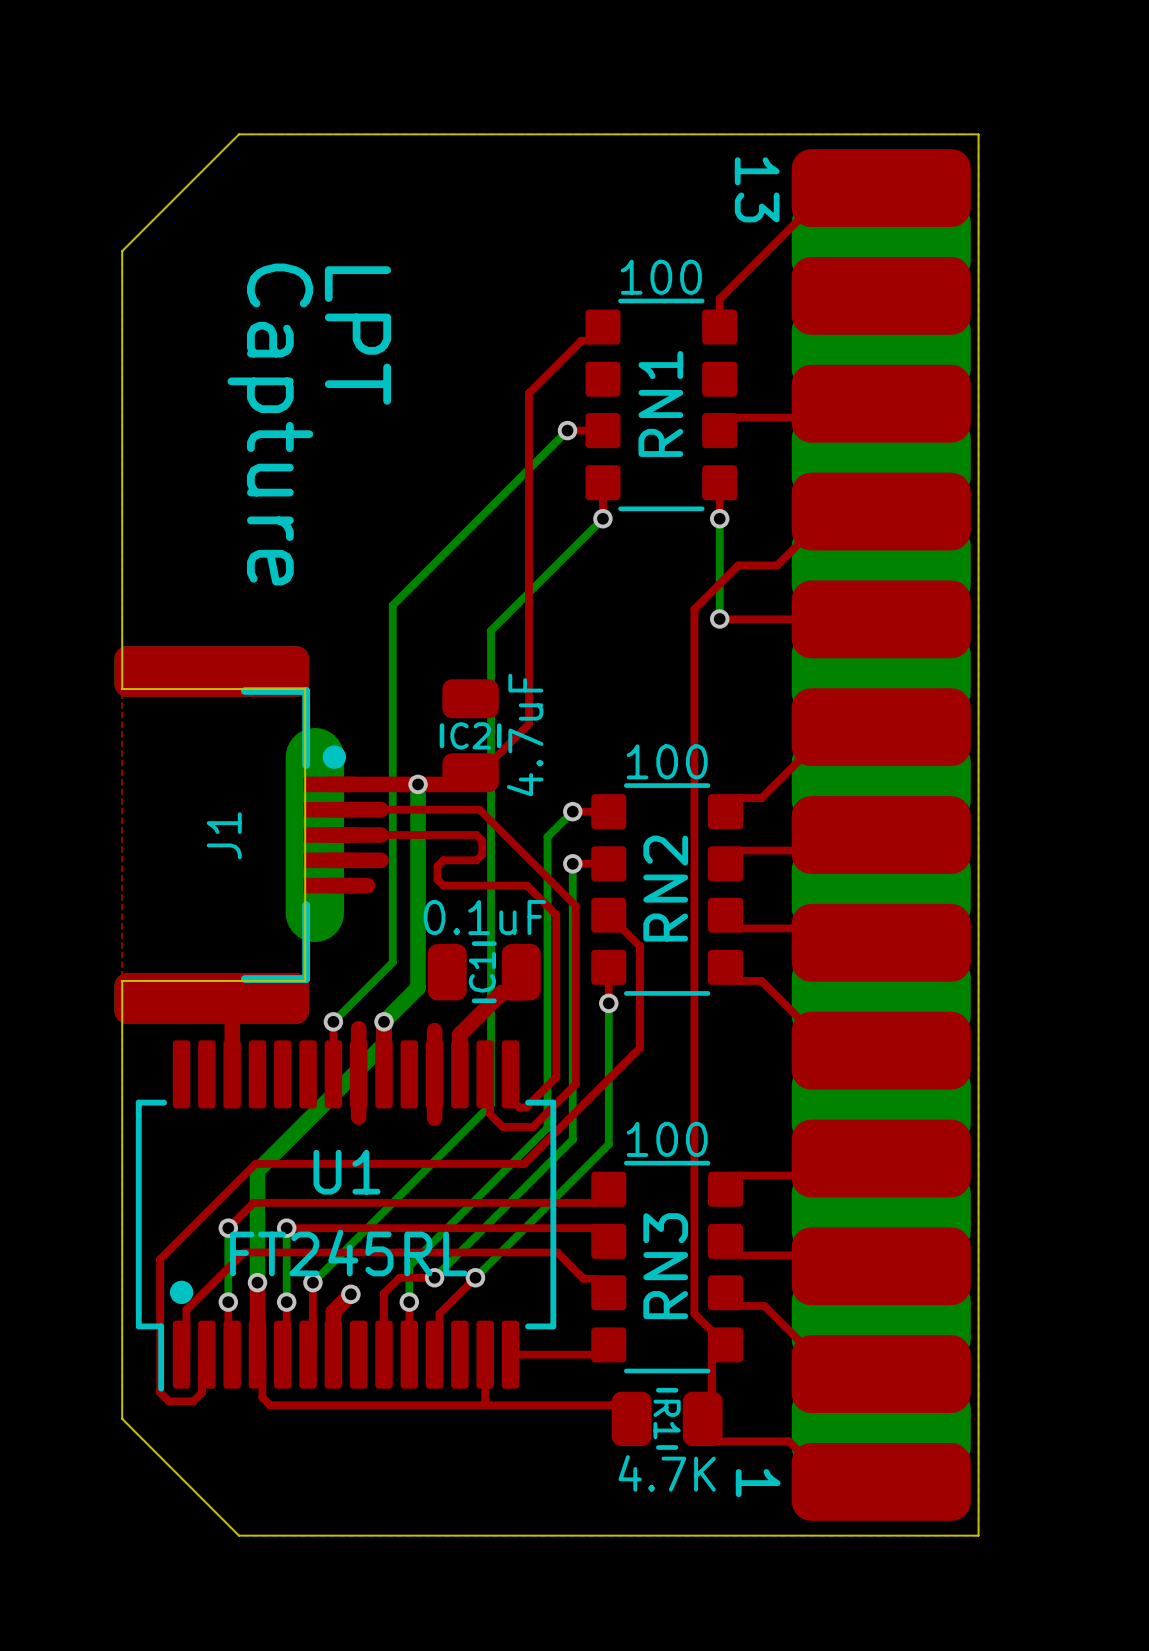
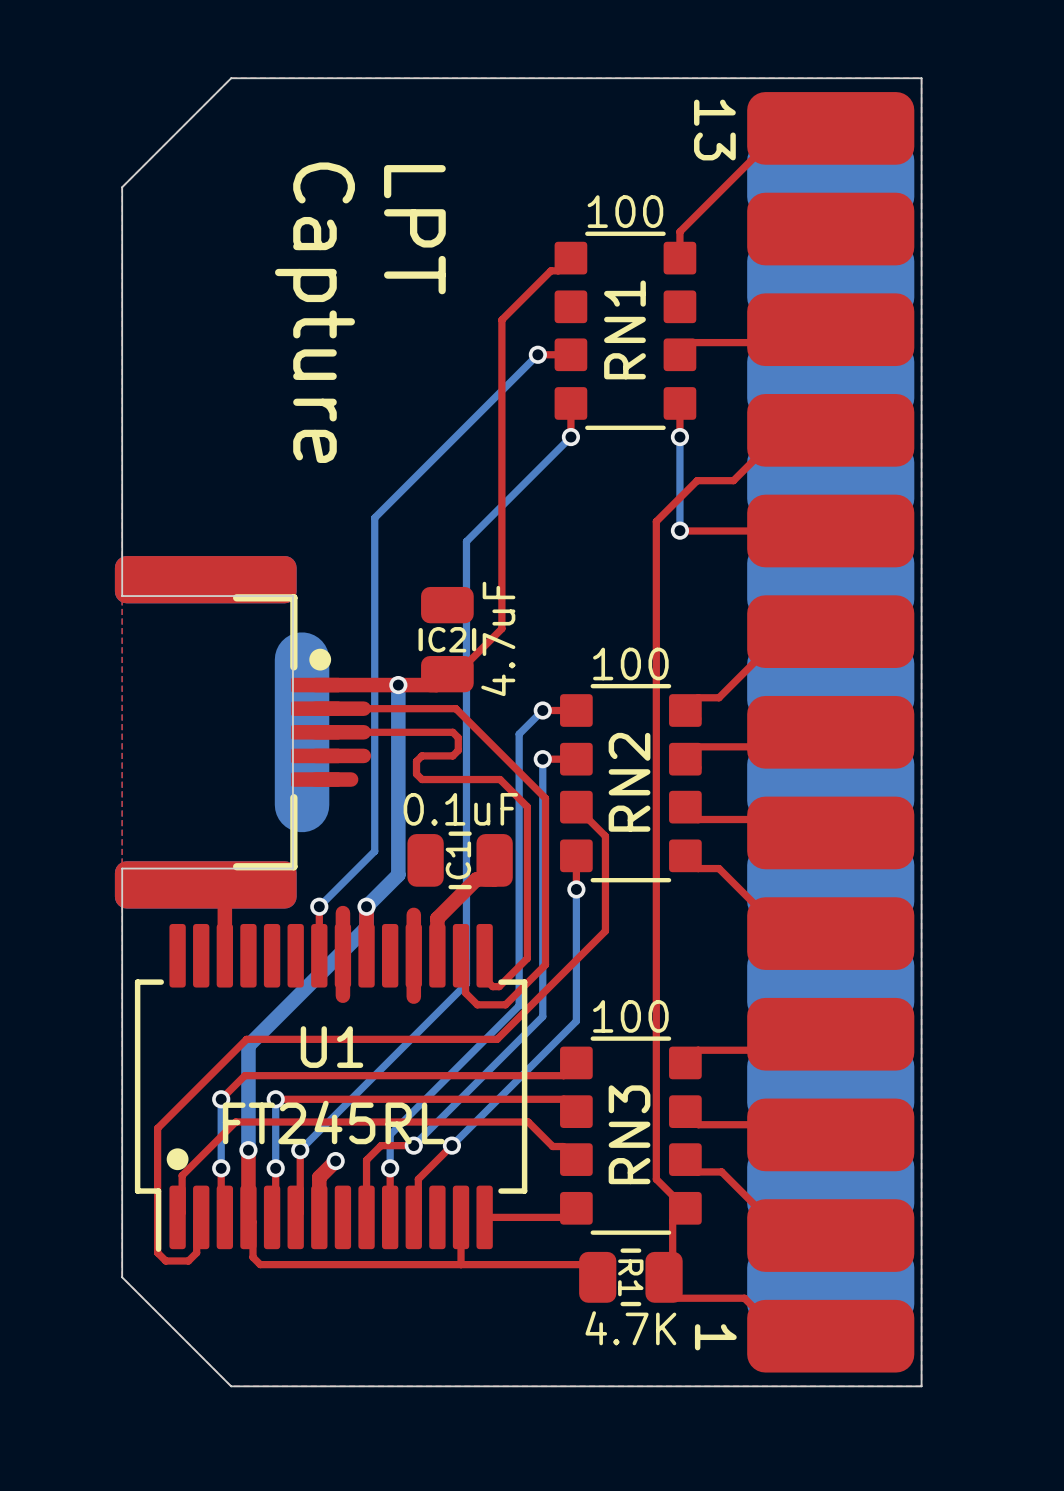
text position: LPT (357, 335) -> LPT (414, 229)
text position: Capture (270, 424) -> Capture (314, 312)
J1 name: J1 (224, 835) -> none

